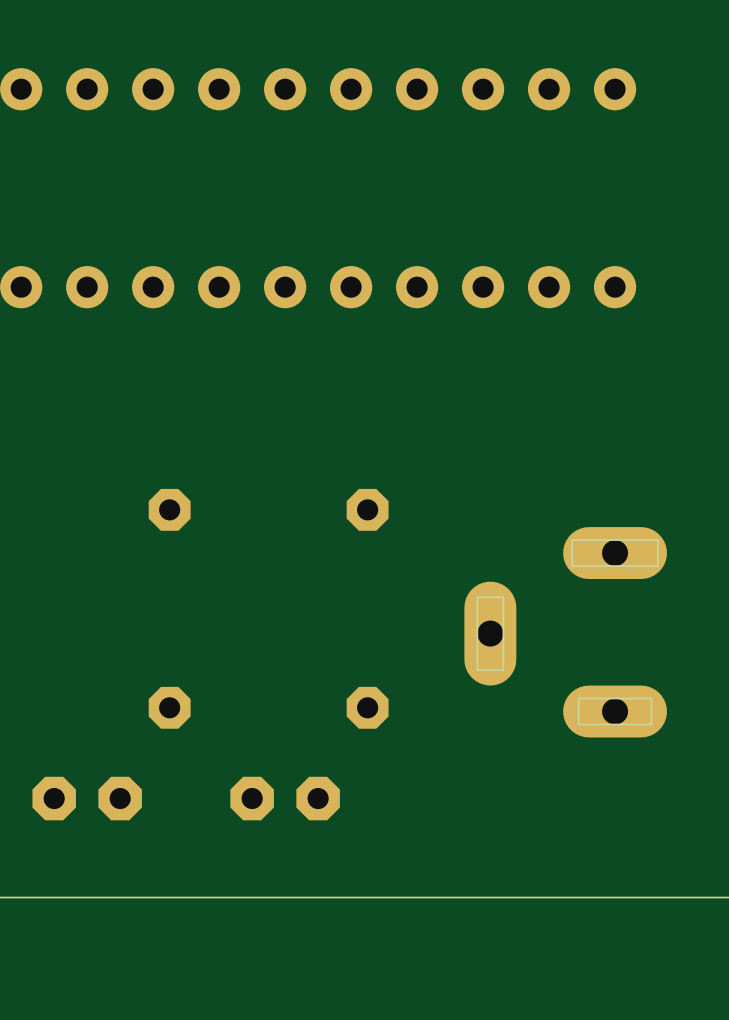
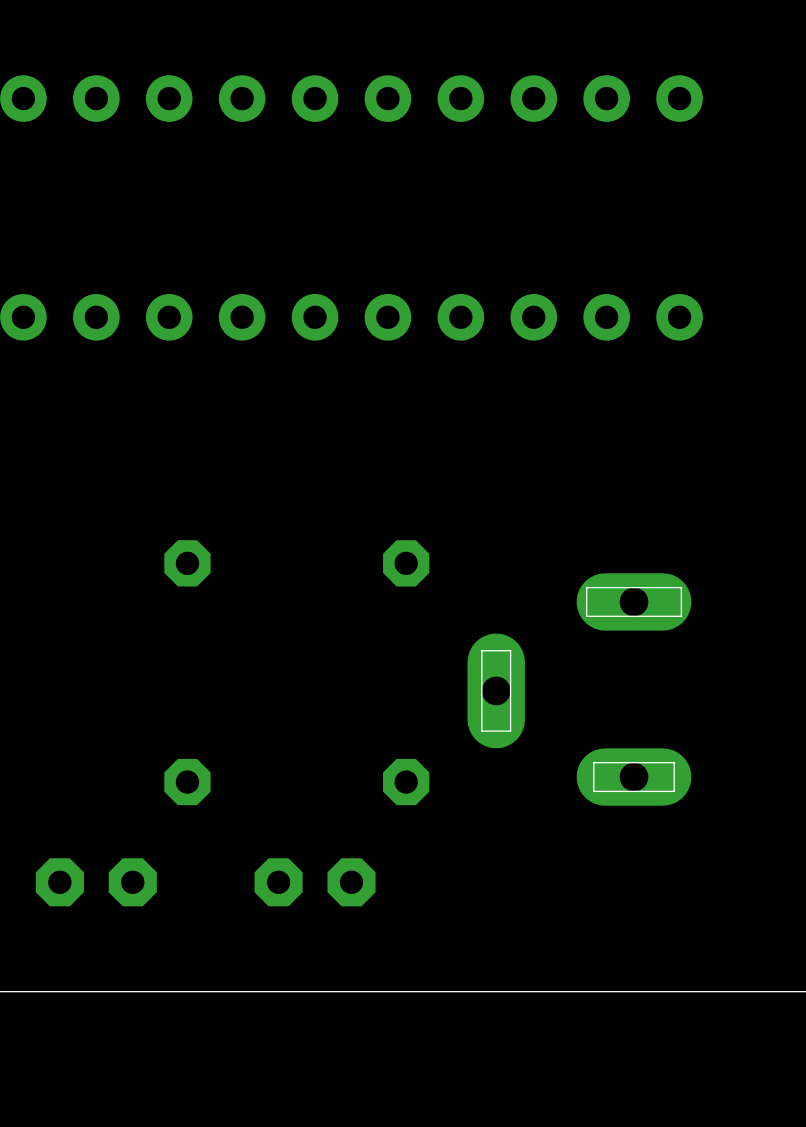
part position: (565, 632) -> (579, 689)

